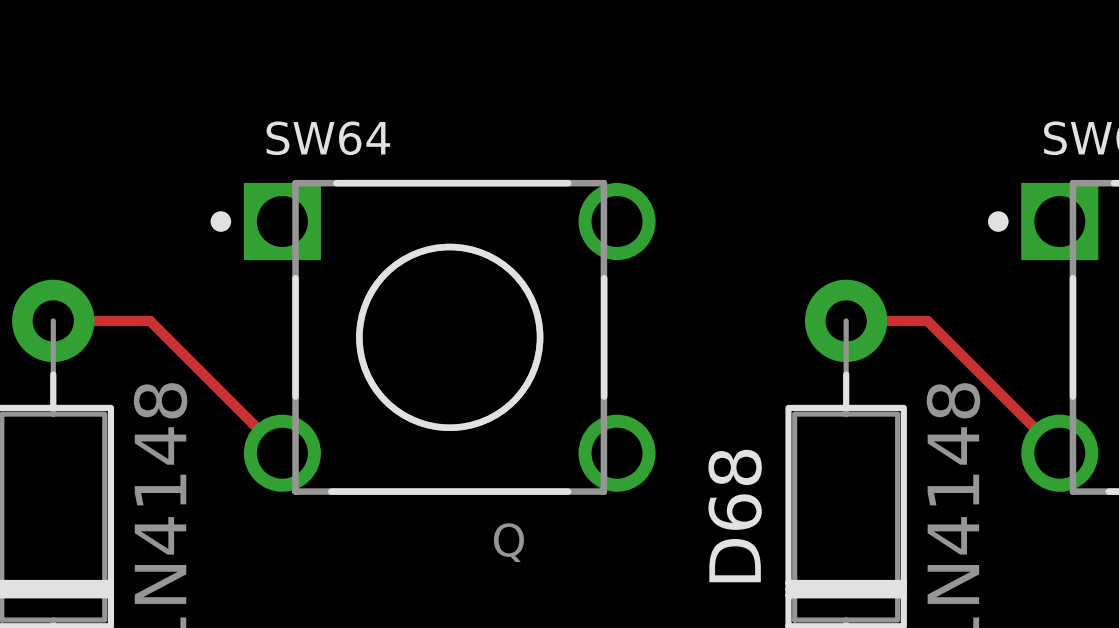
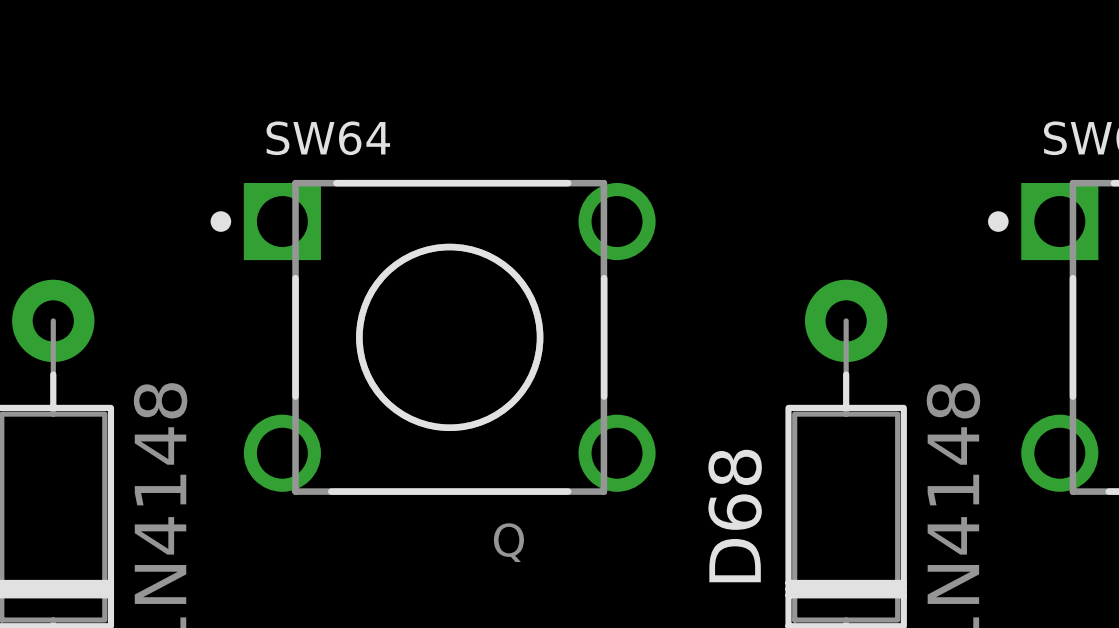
track: (53, 320) (150, 320) (282, 453) -> none
track: (846, 320) (927, 320) (1059, 453) -> none

